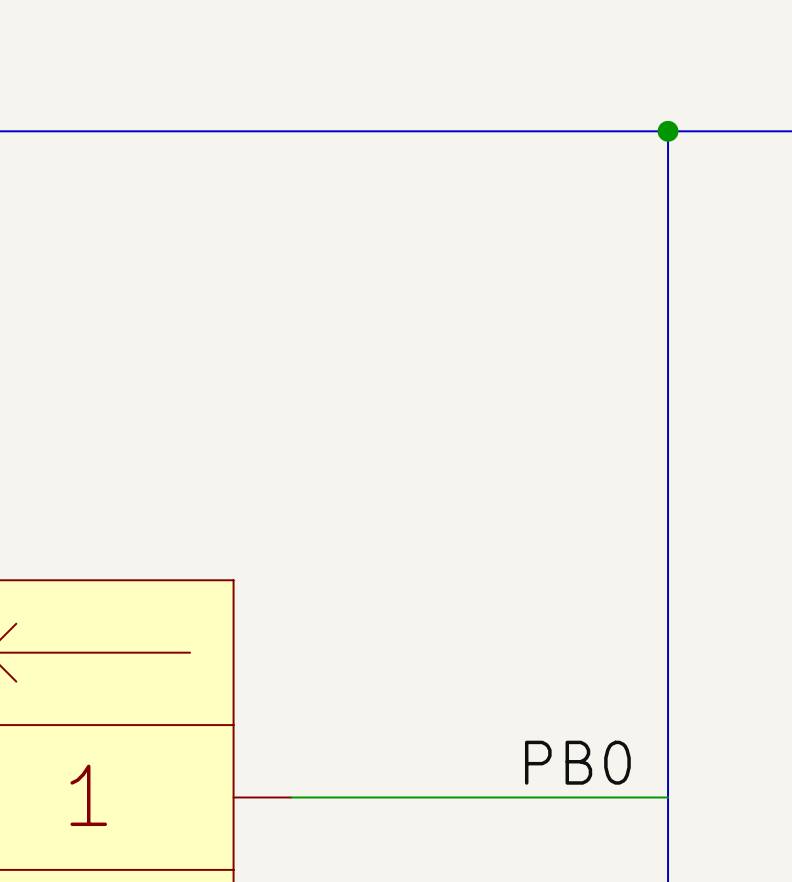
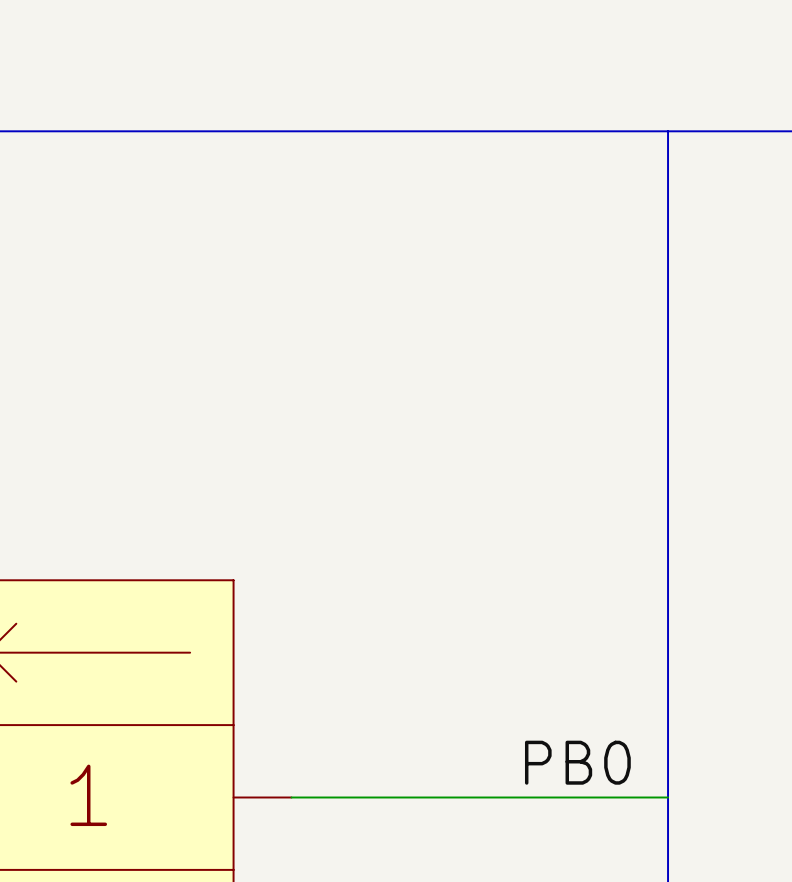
junction: (668, 131) -> none

